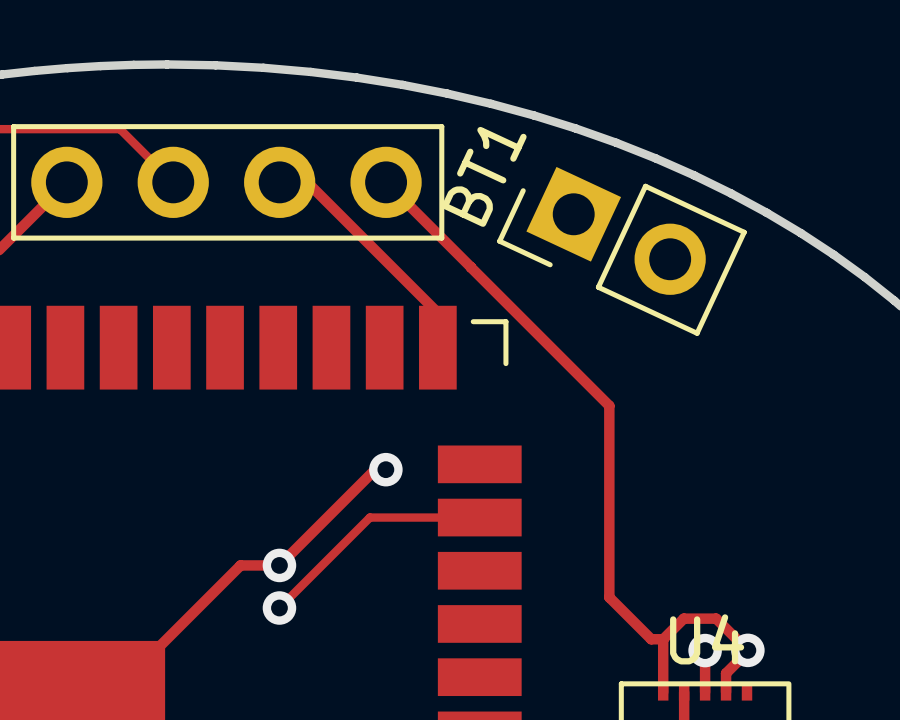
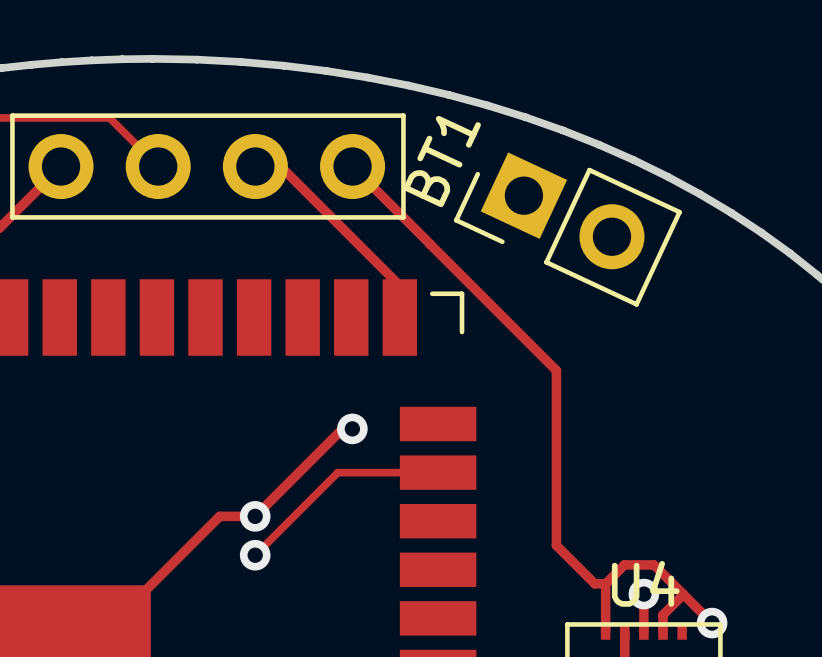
track: none -> (682, 593) (712, 623)
via position: (747, 650) -> (712, 623)

